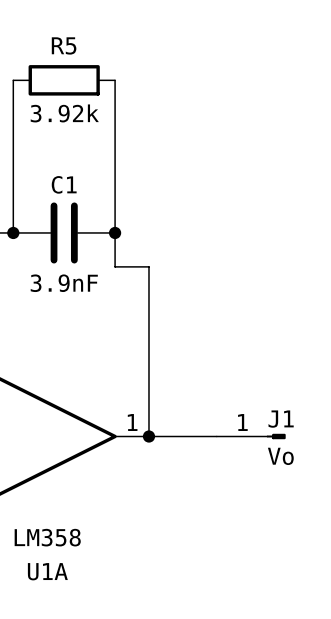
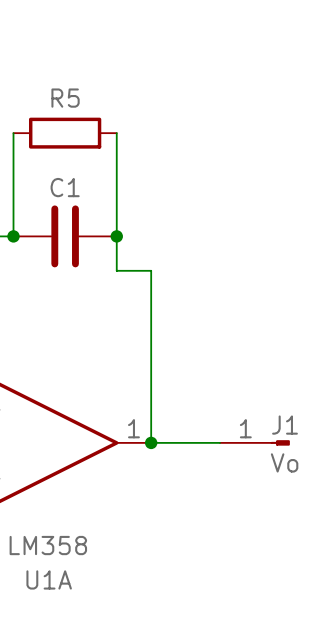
wire: (13, 80) (13, 131) -> none
R5 position: (64, 80) -> (65, 133)
wire: (115, 80) (115, 131) -> none
R5 value: 3.92k (64, 113) -> none
C1 value: 3.9nF (64, 283) -> none

